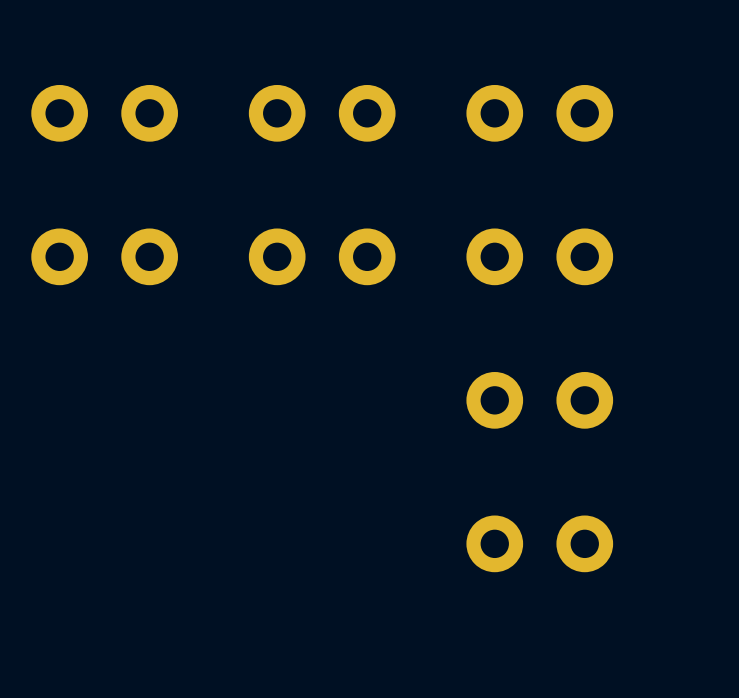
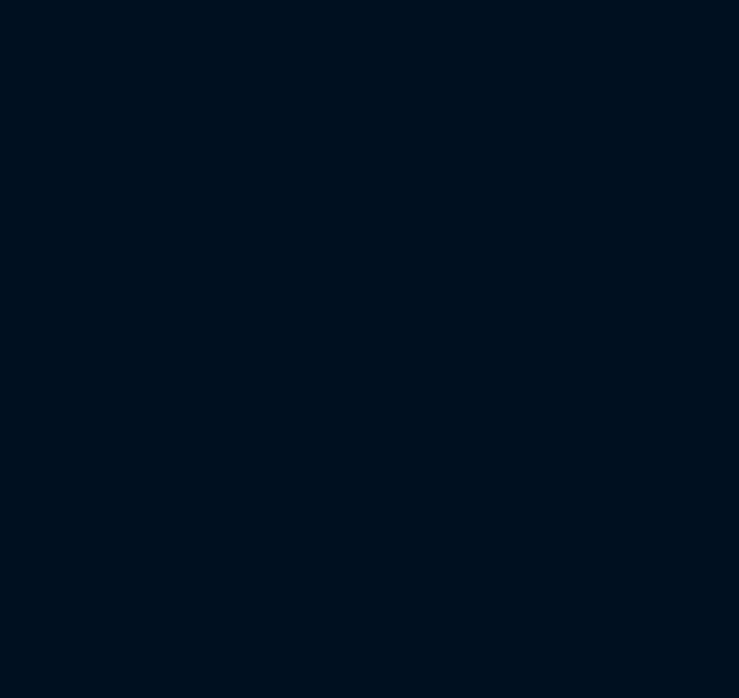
part: (104, 113) -> none
part: (322, 113) -> none
part: (539, 113) -> none
part: (104, 256) -> none
part: (322, 256) -> none
part: (539, 256) -> none
part: (539, 400) -> none
part: (539, 543) -> none

